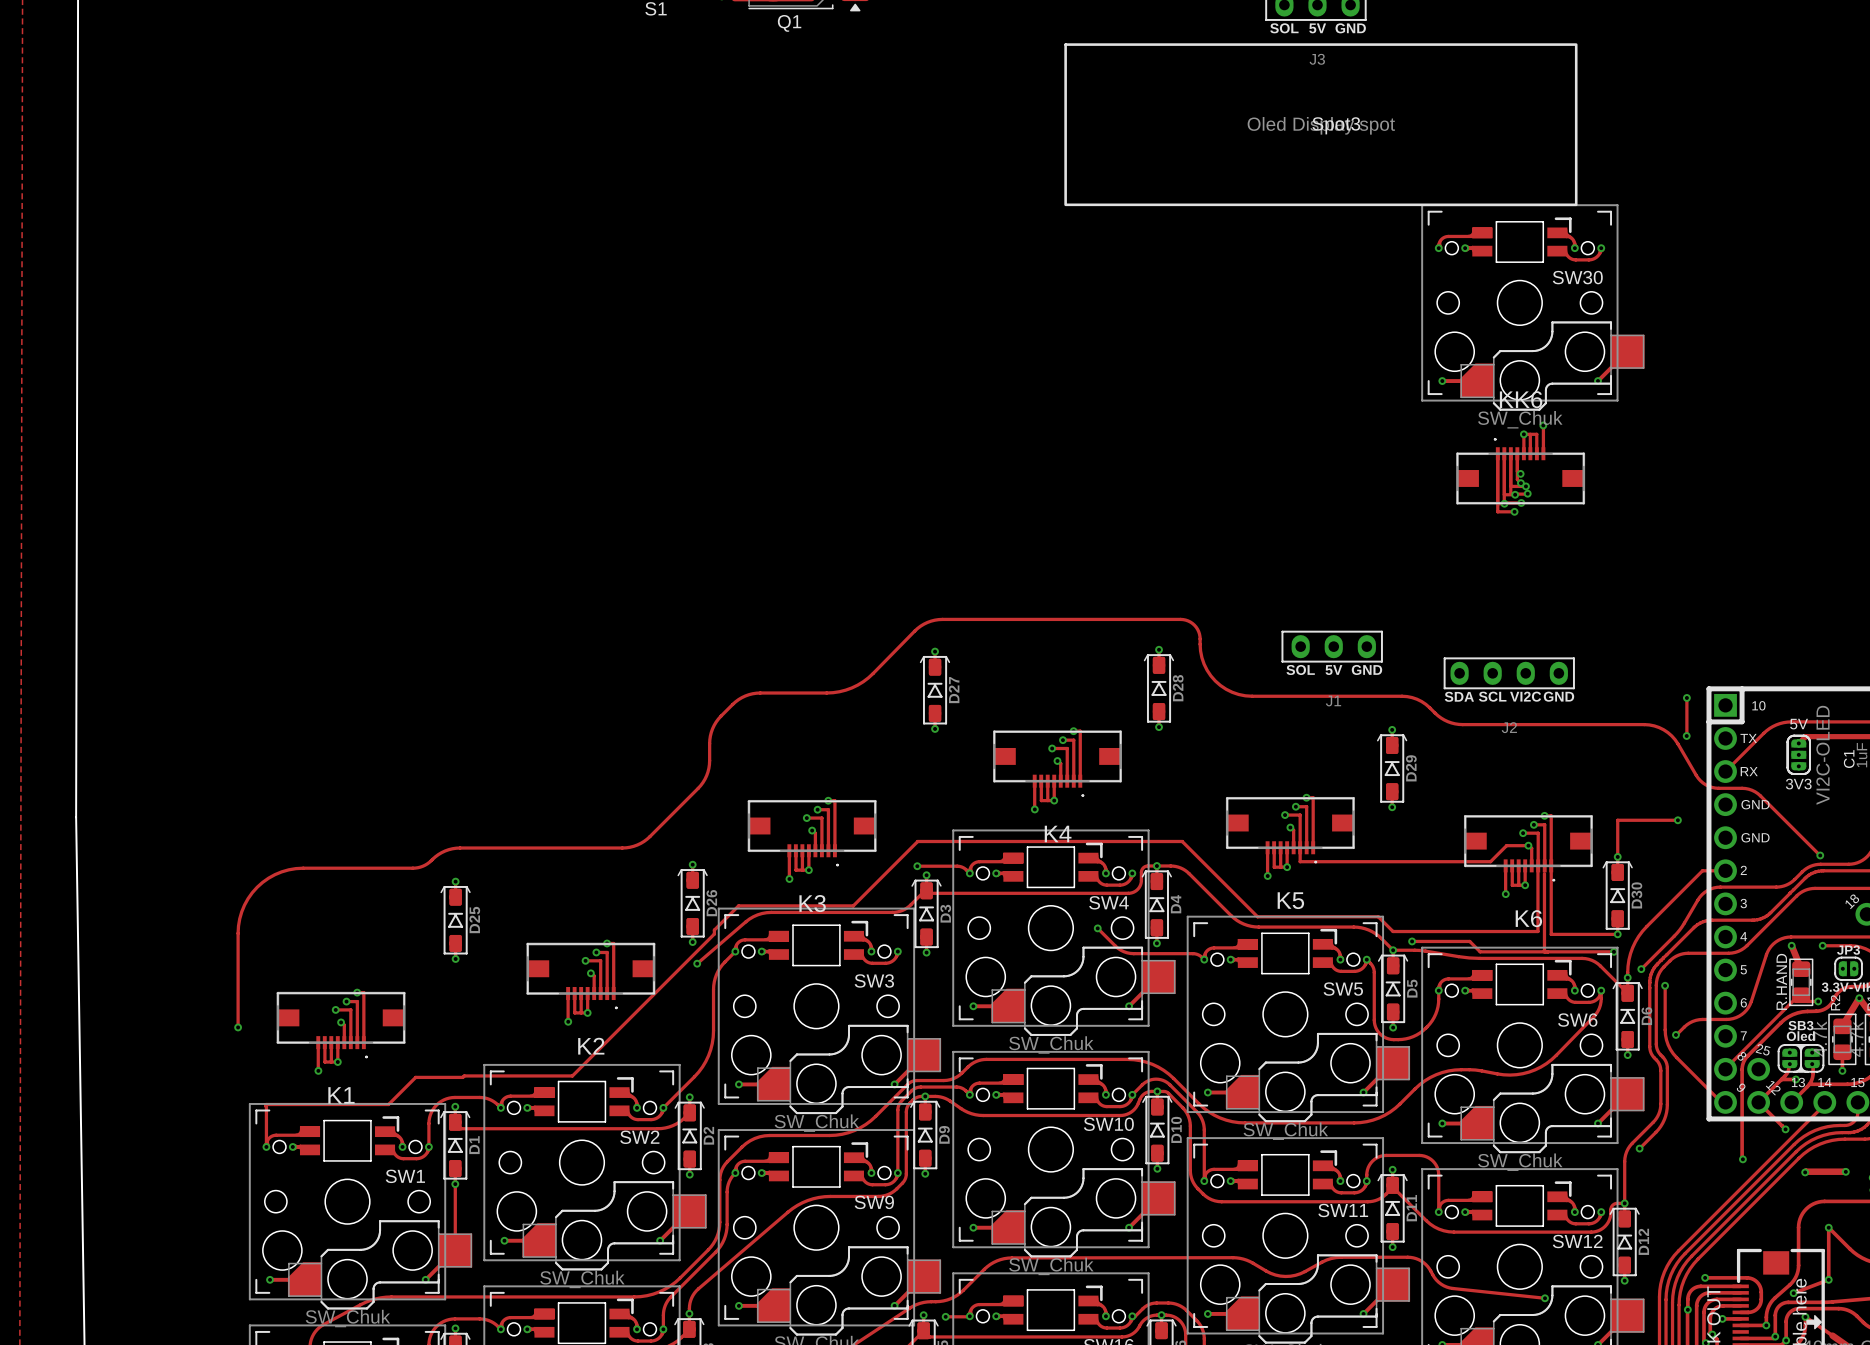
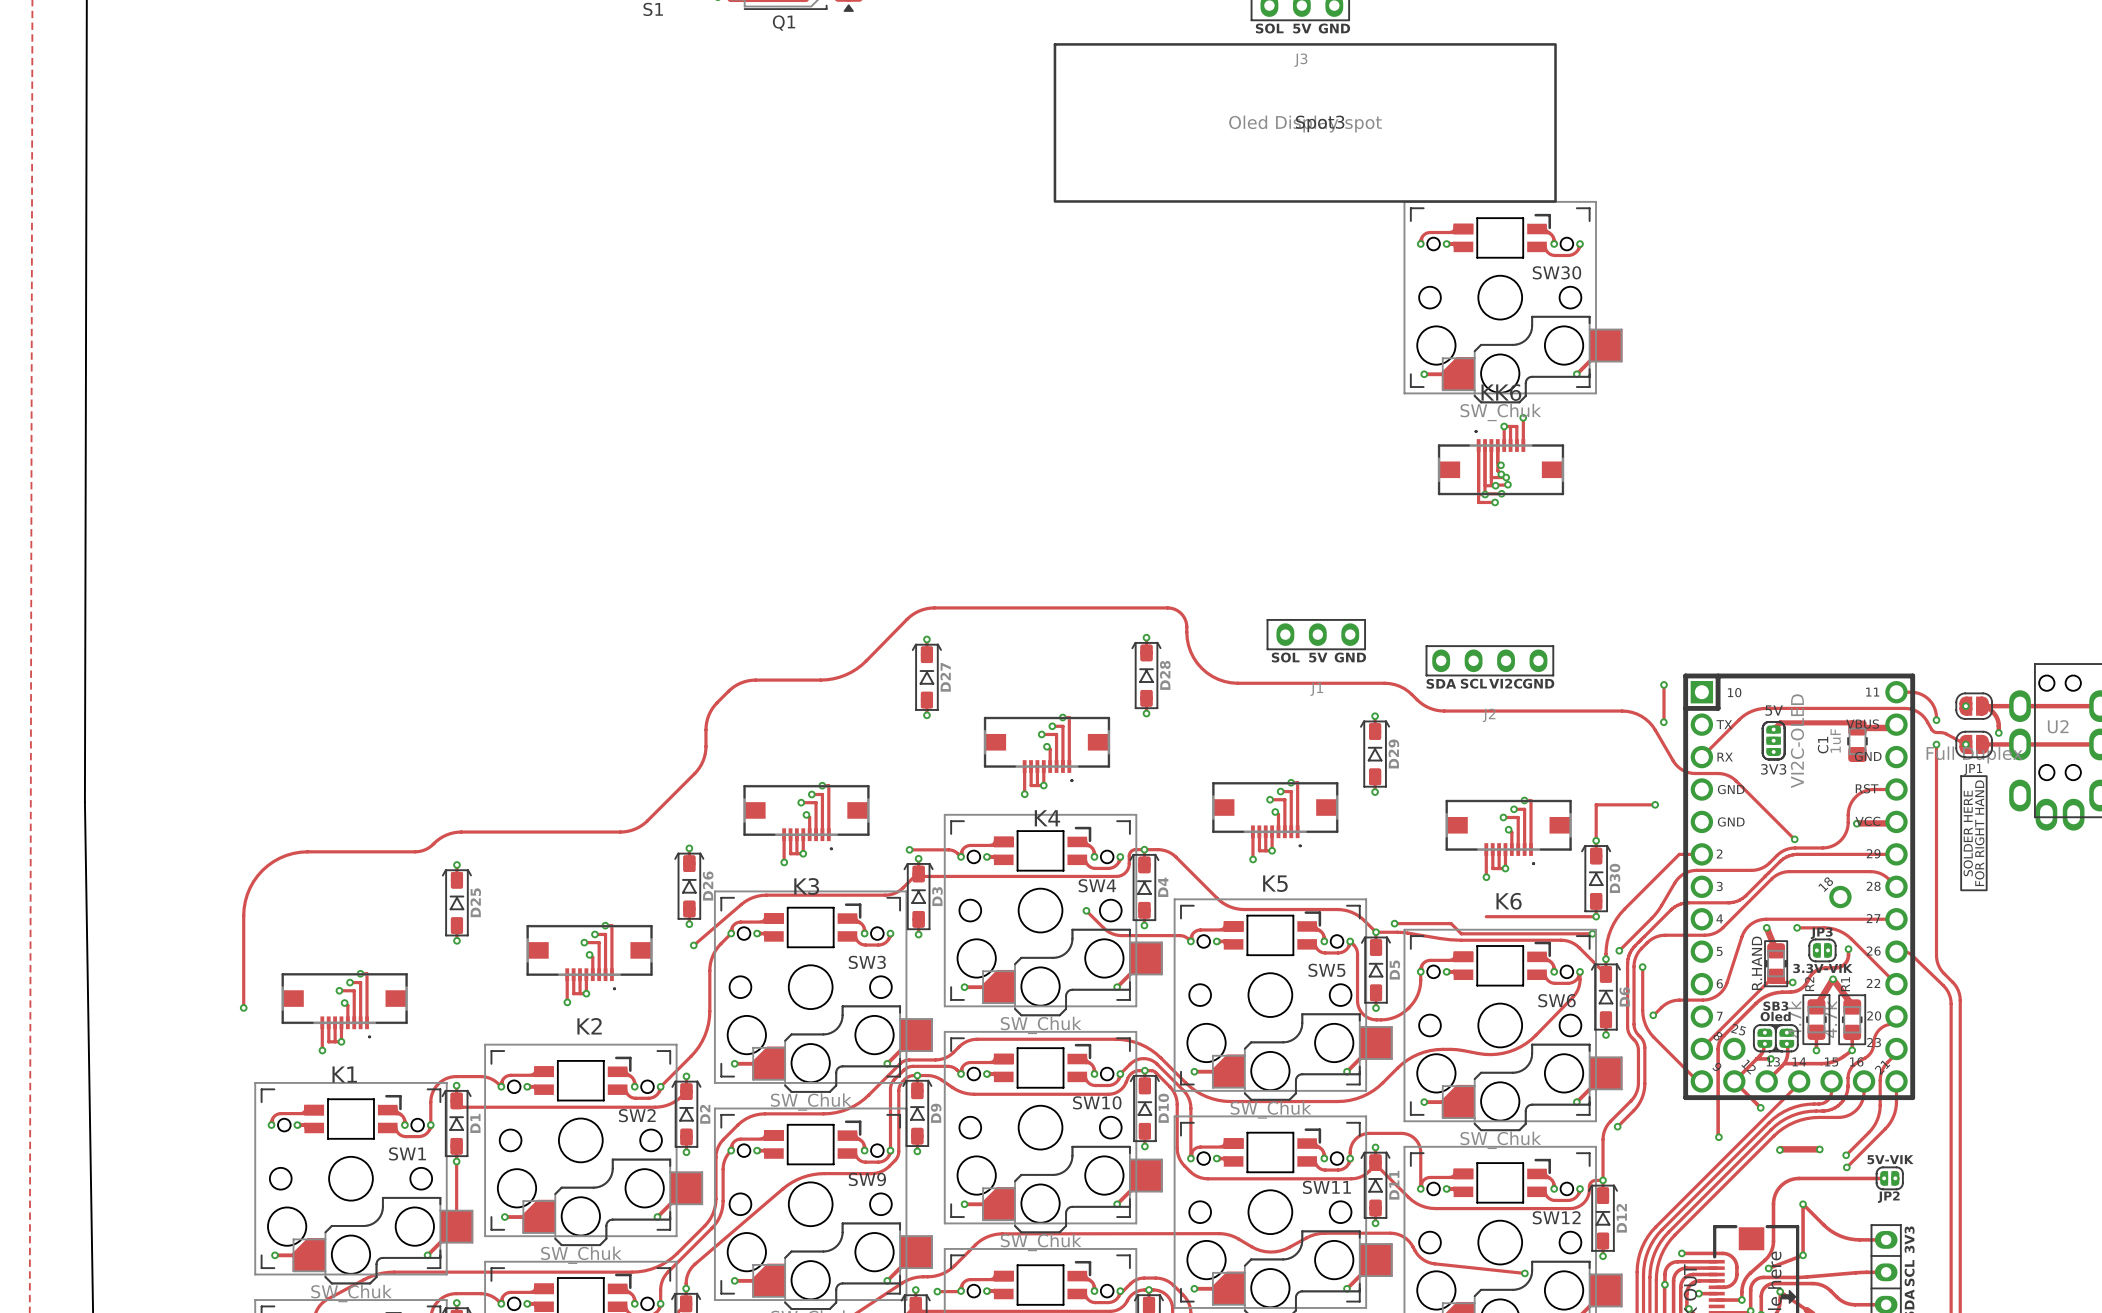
track: (1528, 845) (1506, 845) (1490, 861) (1300, 861) (1300, 847) -> none
track: (1538, 865) (1537, 931) (1393, 931) (1378, 916) (1257, 916) (1182, 841) (917, 841) (853, 905) (738, 905) (714, 930) (714, 934) (572, 1075) (415, 1077) (388, 1104) (266, 1104) (266, 1146) -> none
track: (1551, 865) (1551, 934) -> (1486, 916) (1531, 916)
track: (1544, 873) (1544, 951) -> none

